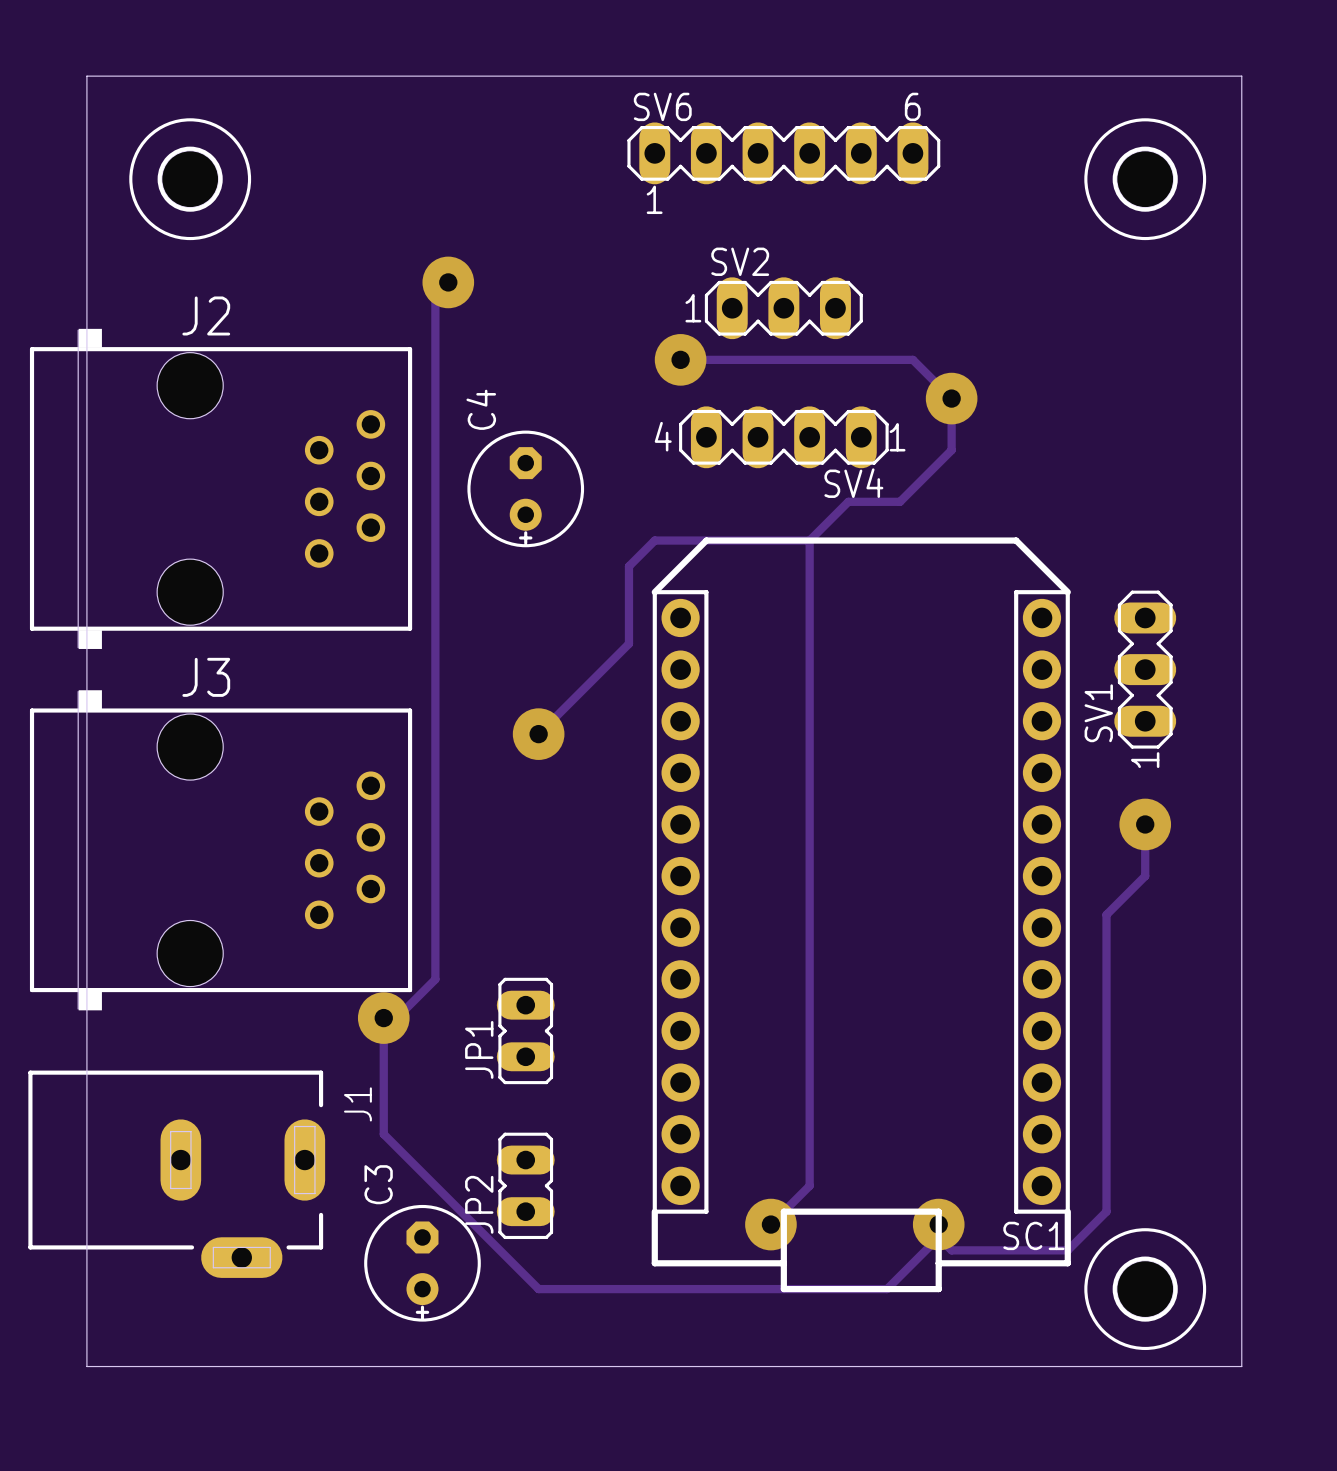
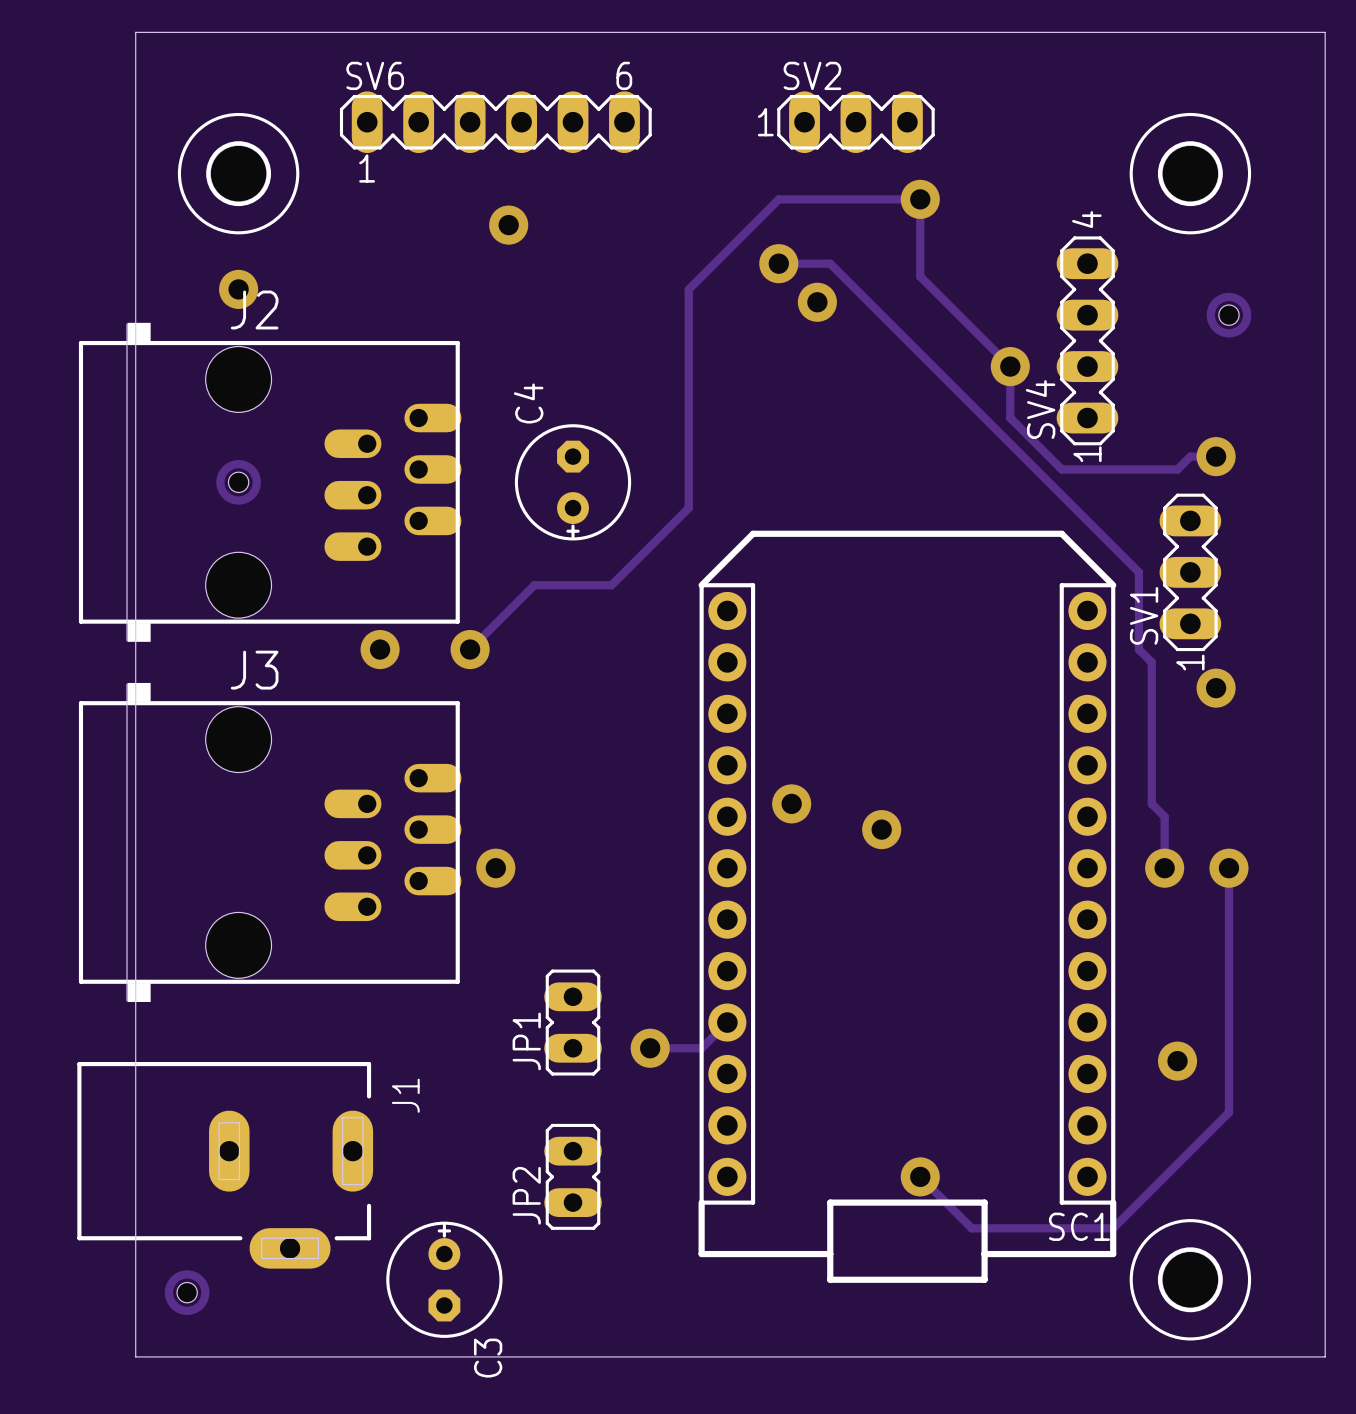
board edge: (86, 76) (1241, 76) (1241, 1366) -> (135, 70) (135, 32) (1325, 32) (1325, 1356) (1286, 1356)
SV6 position: (783, 153) -> (495, 122)
track: none -> (920, 199) (920, 276) (1010, 366) (1010, 418) (1061, 469) (1177, 469) (1190, 456) (1216, 456)
via: none -> (920, 199)
track: none -> (920, 212) (907, 199) (778, 199) (688, 289) (688, 508) (611, 585) (534, 585) (470, 649)
via: none -> (508, 225)
track: none -> (778, 263) (830, 263) (1138, 572) (1138, 649) (1151, 662) (1151, 803) (1164, 816) (1164, 868)
via: none -> (778, 263)
track: (448, 282) (435, 295) (435, 979) (396, 1018) (383, 1018) (383, 1134) (538, 1289) (887, 1289) (938, 1237) -> none
via: (448, 282) -> none
via: none -> (238, 289)
drawing: none -> [1206, 292, 1252, 338]
via: none -> (817, 302)
SV2 position: (783, 308) -> (855, 122)
hole: none -> (1228, 315)
J2 footprint: [29, 328, 413, 649] -> [78, 322, 462, 642]
track: (680, 359) (912, 359) (951, 398) (951, 450) (900, 501) (848, 501) (809, 540) -> none
via: (680, 359) -> none
via: none -> (1010, 366)
via: (951, 398) -> none
SV4 footprint: [679, 406, 889, 469] -> [1056, 236, 1119, 446]
via: none -> (1216, 456)
drawing: none -> [216, 460, 261, 505]
SV4 name position: SV4 (853, 483) -> SV4 (1040, 409)
hole: none -> (238, 482)
track: (809, 540) (809, 1185) (770, 1224) -> none
track: (809, 540) (654, 540) (628, 566) (628, 643) (538, 734) -> none
via: none -> (380, 649)
via: none -> (470, 649)
SV1 position: (1145, 669) -> (1190, 572)
J3 footprint: [29, 690, 413, 1011] -> [78, 682, 462, 1002]
via: none -> (1216, 688)
via: (538, 734) -> none
via: none -> (791, 803)
track: (1145, 824) (1145, 876) (1106, 914) (1106, 1211) (1067, 1250) (951, 1250) (938, 1237) -> none
via: (1145, 824) -> none
via: none -> (881, 829)
via: none -> (495, 868)
via: none -> (1164, 868)
track: none -> (1228, 868) (1228, 1112) (1113, 1228) (971, 1228) (920, 1176)
via: none -> (1228, 868)
via: (383, 1018) -> none
track: none -> (727, 1022) (701, 1048) (650, 1048)
via: none -> (650, 1048)
via: none -> (1177, 1061)
via: none -> (920, 1176)
via: (770, 1224) -> none
via: (938, 1224) -> none
C3 rotation: 0° (422, 1263) -> 180° (444, 1279)
drawing: none -> [164, 1270, 210, 1315]
hole: none -> (187, 1292)

